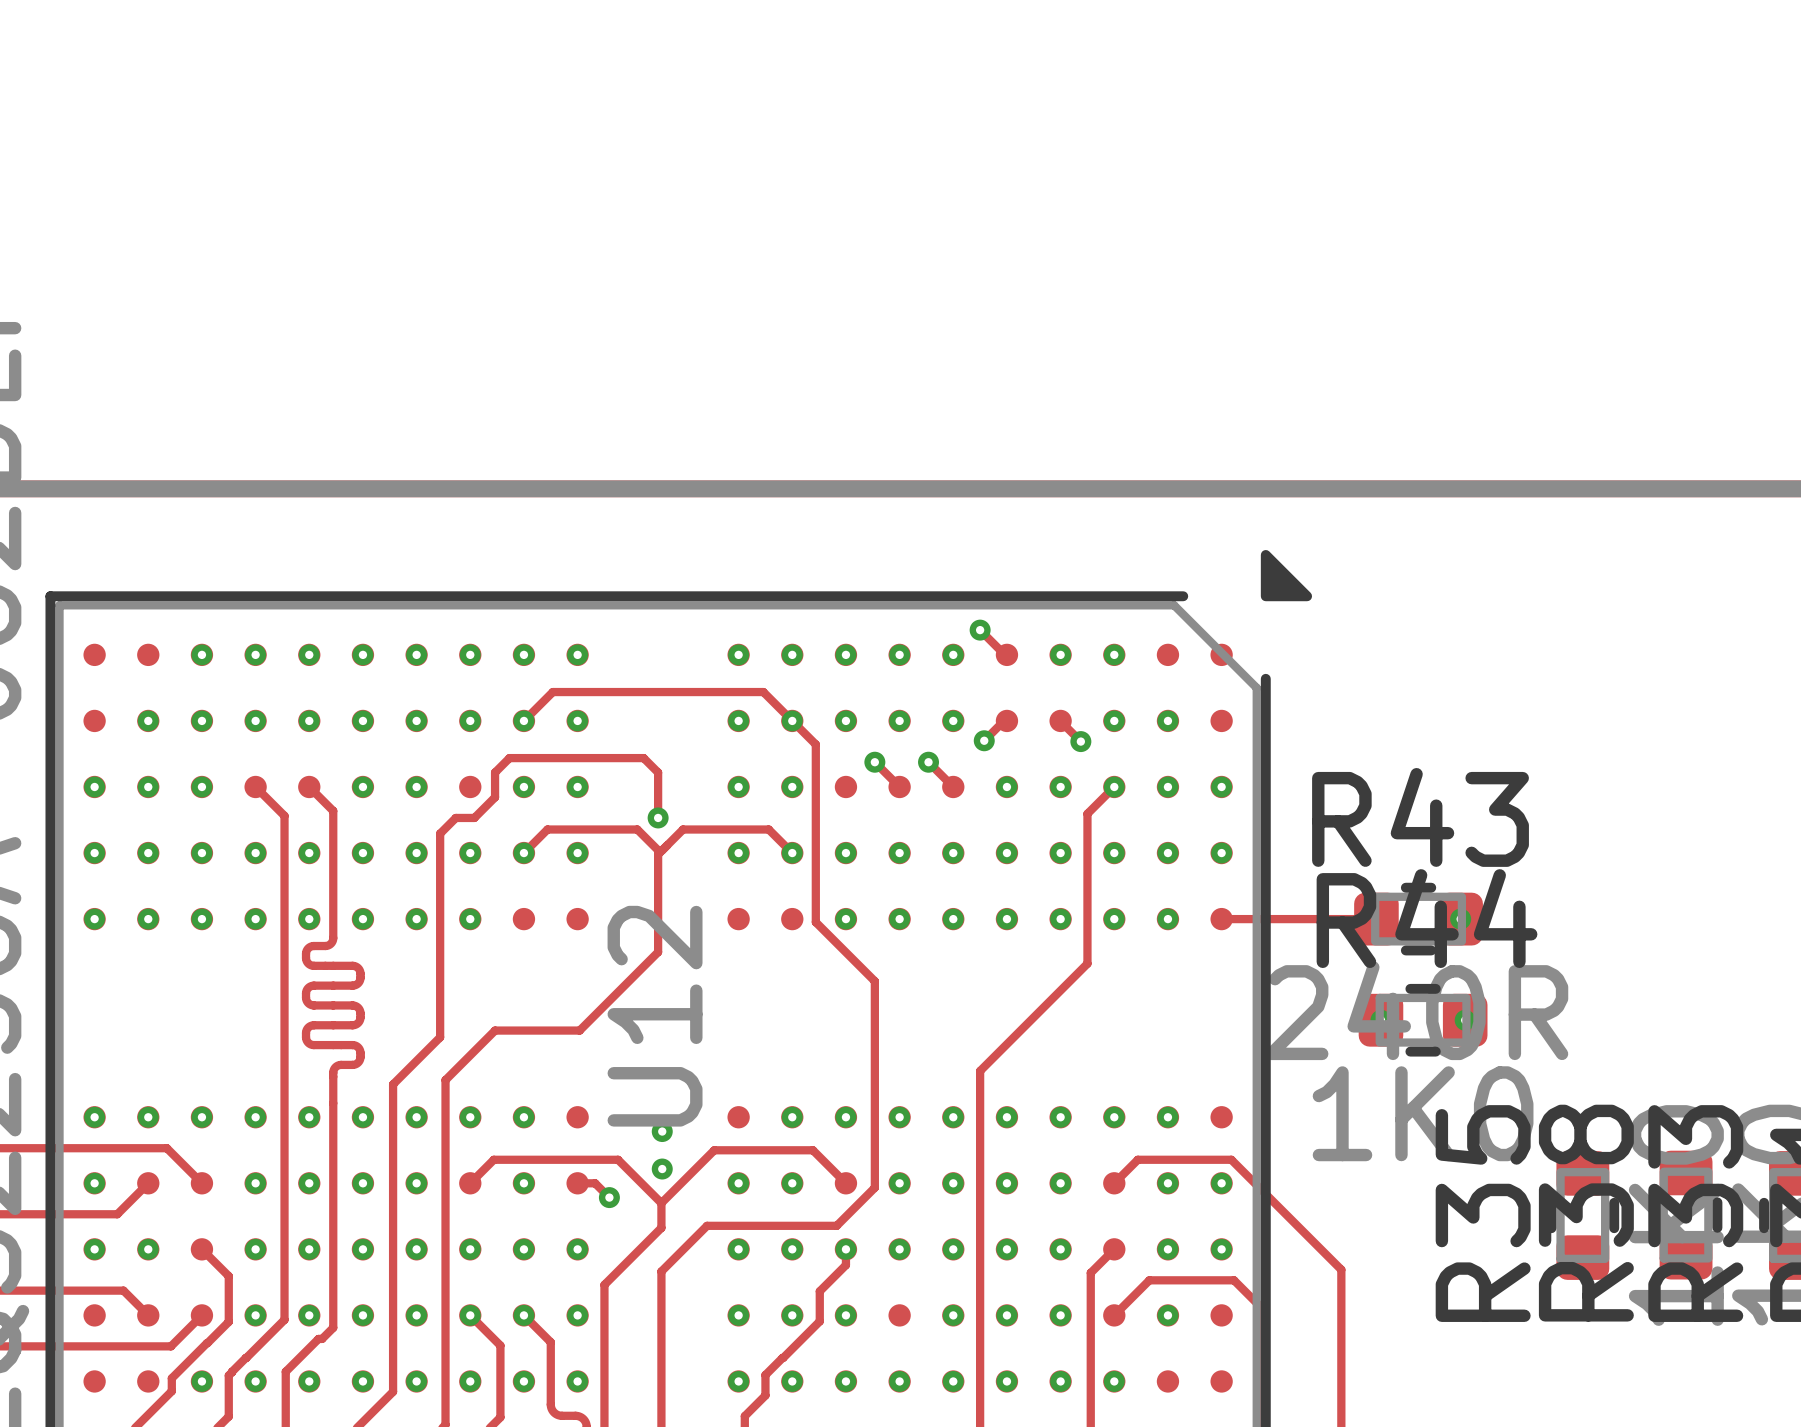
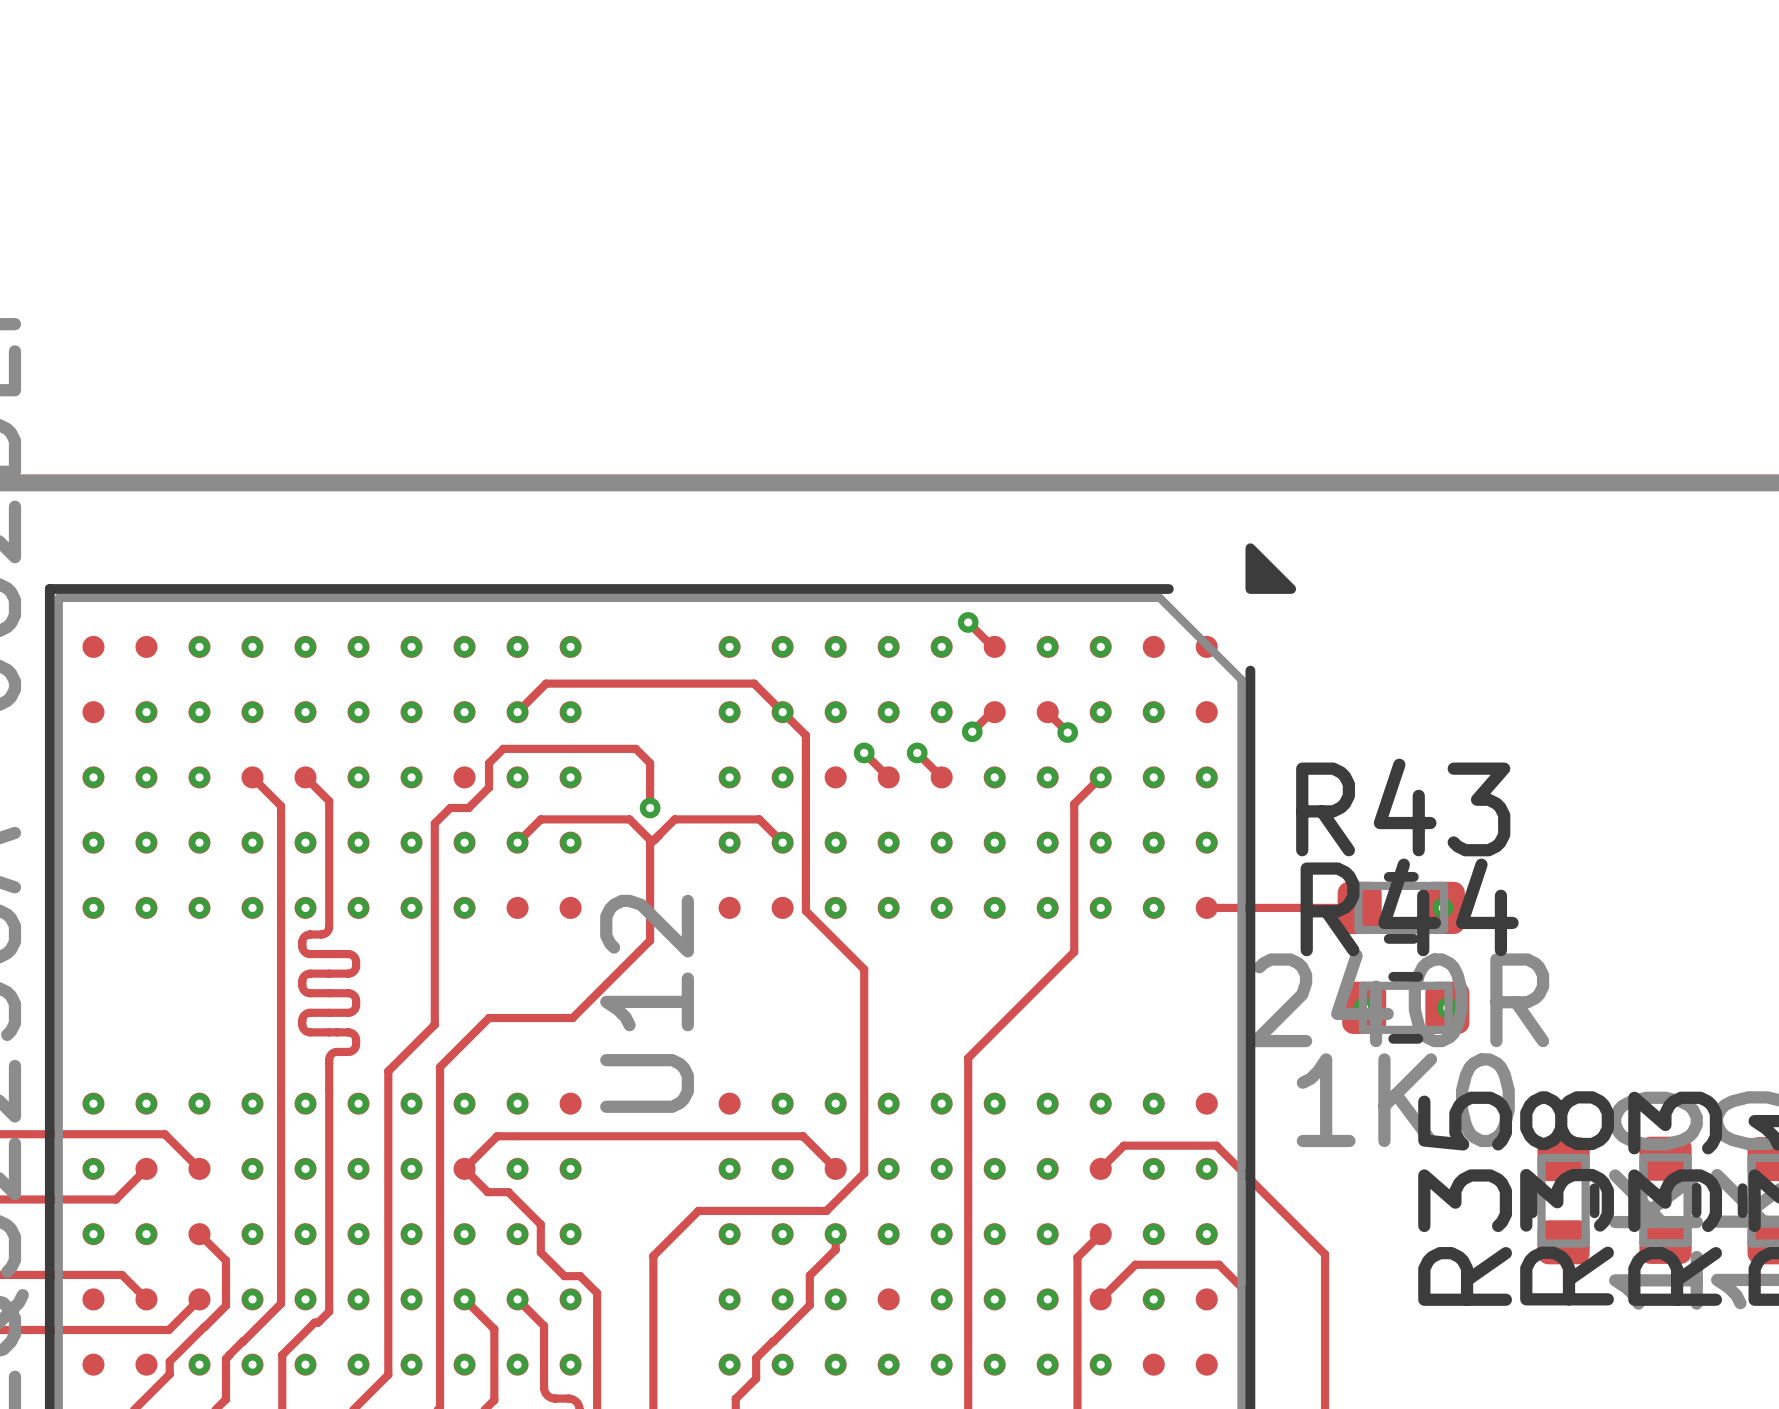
via: (662, 1131) -> none
track: (714, 1150) (661, 1203) -> none
track: (493, 1159) (618, 1159) (661, 1203) -> (487, 1145) (497, 1136) (705, 1136)
via: (662, 1169) -> none
track: (577, 1183) (595, 1183) (609, 1197) -> none
via position: (609, 1197) -> (570, 1168)
track: (661, 1203) (661, 1227) (604, 1284) (604, 1308) -> (464, 1168) (487, 1192) (508, 1192) (540, 1224) (540, 1252) (564, 1276) (580, 1276) (597, 1293)

